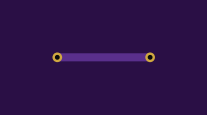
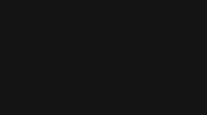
via: (57, 57) -> none
track: (150, 57) (57, 57) -> none
via: (150, 57) -> none

